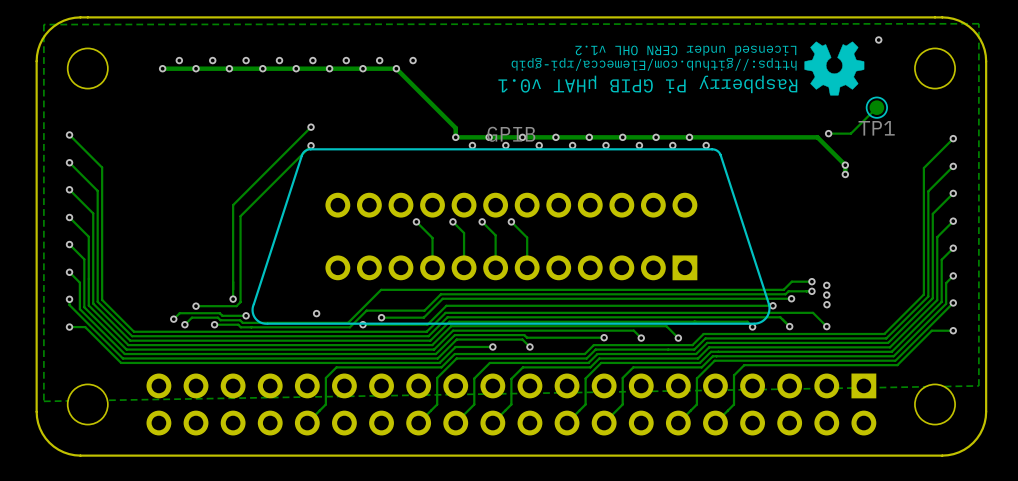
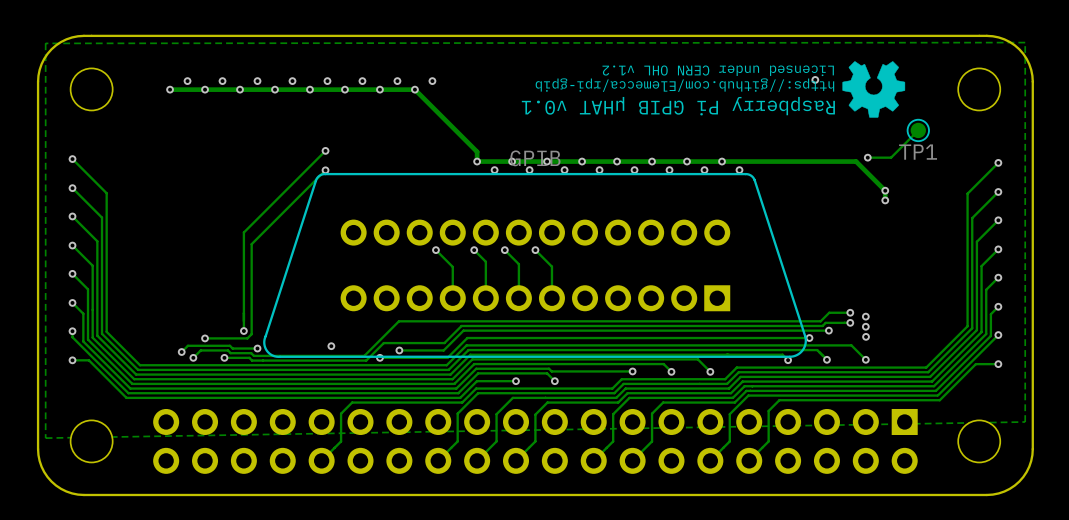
via: (878, 39) -> none
via: none -> (815, 79)

